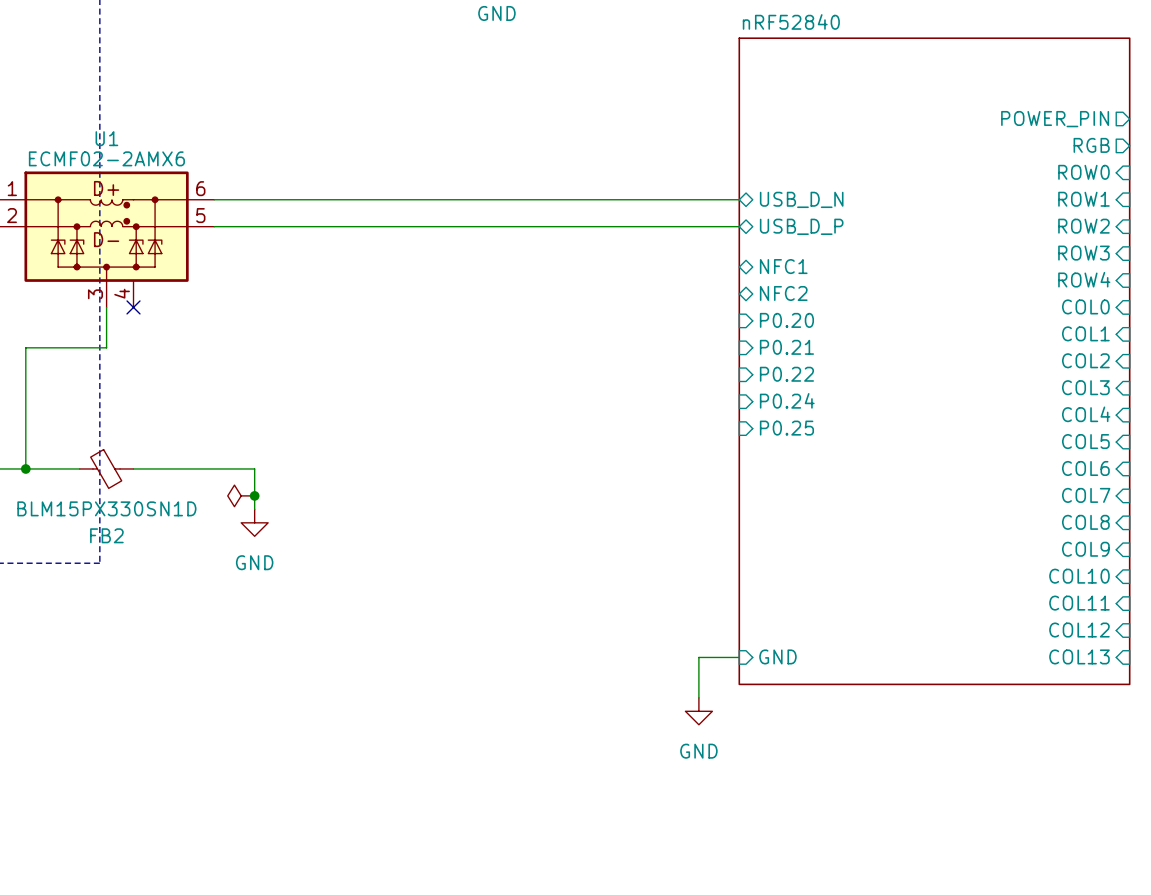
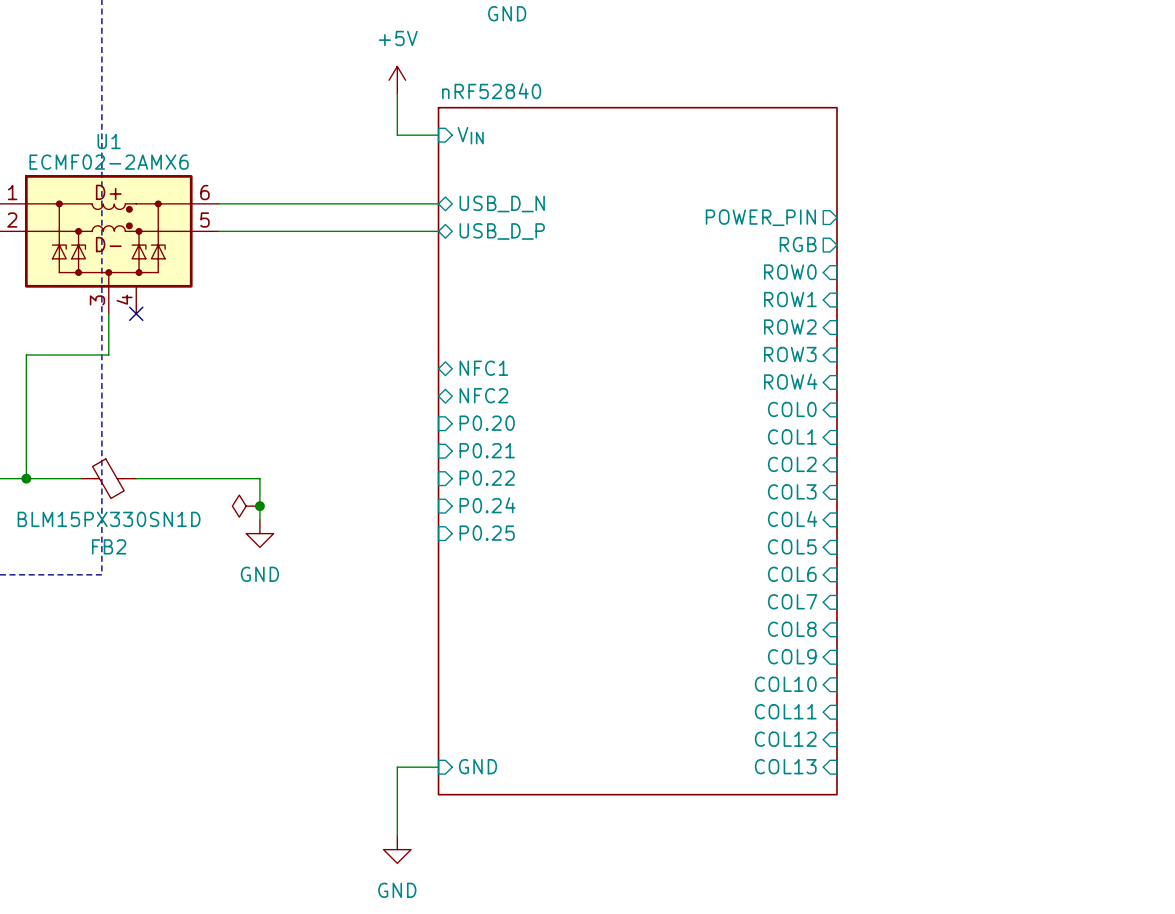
sheet nRF52840 shape: [738, 37, 1131, 686] -> [437, 106, 838, 796]
power symbol: none -> +5V (397, 80)
wire: none -> (397, 93) (397, 135) (438, 135)
sheet pin: POWER_PIN (1055, 119) -> none
sheet pin: none -> VIN (470, 135)
sheet pin: RGB (1091, 145) -> none
sheet pin: ROW0 (1083, 172) -> none
wire: (429, 199) (739, 199) -> none
sheet pin: none -> USB_D_N (502, 204)
sheet pin: USB_D_N (801, 199) -> none
sheet pin: ROW1 (1083, 199) -> none
sheet pin: none -> POWER_PIN (760, 217)
wire: (429, 226) (739, 226) -> none
sheet pin: none -> USB_D_P (502, 231)
sheet pin: USB_D_P (801, 226) -> none
sheet pin: ROW2 (1083, 226) -> none
sheet pin: none -> RGB (798, 244)
sheet pin: ROW3 (1083, 253) -> none
sheet pin: none -> ROW0 (790, 272)
sheet pin: NFC1 (783, 266) -> none
sheet pin: ROW4 (1084, 279) -> none
sheet pin: none -> ROW1 (790, 299)
sheet pin: NFC2 (783, 293) -> none
sheet pin: COL0 (1085, 306) -> none
sheet pin: none -> ROW2 (790, 327)
sheet pin: P0.20 (786, 320) -> none
sheet pin: COL1 (1085, 333) -> none
sheet pin: none -> ROW3 (790, 354)
sheet pin: P0.21 (786, 347) -> none
sheet pin: none -> NFC1 (483, 368)
sheet pin: COL2 (1085, 360) -> none
sheet pin: none -> ROW4 (790, 381)
sheet pin: P0.22 (786, 374) -> none
sheet pin: none -> NFC2 (483, 395)
sheet pin: COL3 (1085, 387) -> none
sheet pin: P0.24 (787, 400) -> none
sheet pin: none -> COL0 (792, 409)
sheet pin: none -> P0.20 (487, 423)
sheet pin: COL4 (1086, 414) -> none
sheet pin: none -> COL1 (792, 436)
sheet pin: P0.25 (786, 428) -> none
sheet pin: none -> P0.21 (487, 450)
sheet pin: COL5 (1085, 441) -> none
sheet pin: none -> COL2 (792, 464)
sheet pin: none -> P0.22 (487, 478)
sheet pin: COL6 (1085, 468) -> none
sheet pin: none -> COL3 (792, 491)
sheet pin: none -> P0.24 (487, 505)
sheet pin: COL7 (1086, 495) -> none
sheet pin: none -> COL4 (792, 519)
sheet pin: none -> P0.25 (487, 533)
sheet pin: COL8 (1085, 522) -> none
sheet pin: none -> COL5 (792, 546)
sheet pin: COL9 (1085, 549) -> none
sheet pin: none -> COL6 (792, 574)
sheet pin: COL10 (1079, 576) -> none
sheet pin: none -> COL7 (792, 601)
sheet pin: COL11 (1079, 603) -> none
sheet pin: none -> COL8 (792, 629)
sheet pin: COL12 (1079, 630) -> none
sheet pin: none -> COL9 (792, 656)
sheet pin: GND (777, 656) -> none
sheet pin: COL13 (1079, 656) -> none
wire: (739, 657) (698, 657) (698, 697) -> none
sheet pin: none -> COL10 (785, 684)
sheet pin: none -> COL11 (785, 711)
power symbol: GND (698, 711) -> none
sheet pin: none -> COL12 (785, 739)
wire: none -> (438, 767) (397, 767) (397, 835)
sheet pin: none -> GND (478, 766)
sheet pin: none -> COL13 (785, 766)
power symbol: none -> GND (397, 849)

